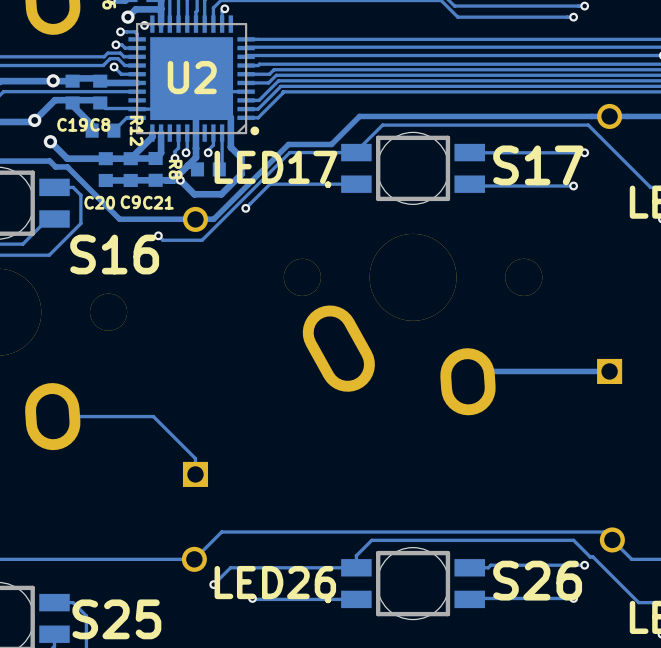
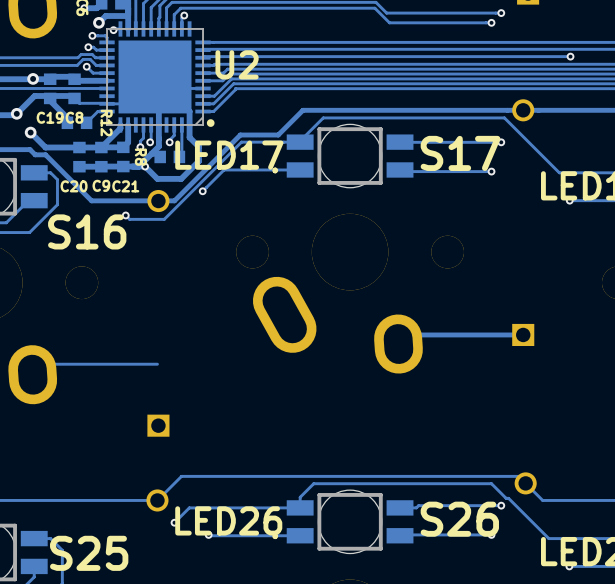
U2 name position: U2 (192, 77) -> U2 (237, 64)
track: (52, 416) (153, 416) (195, 458) (195, 474) -> (32, 374) (43, 364) (157, 364)

